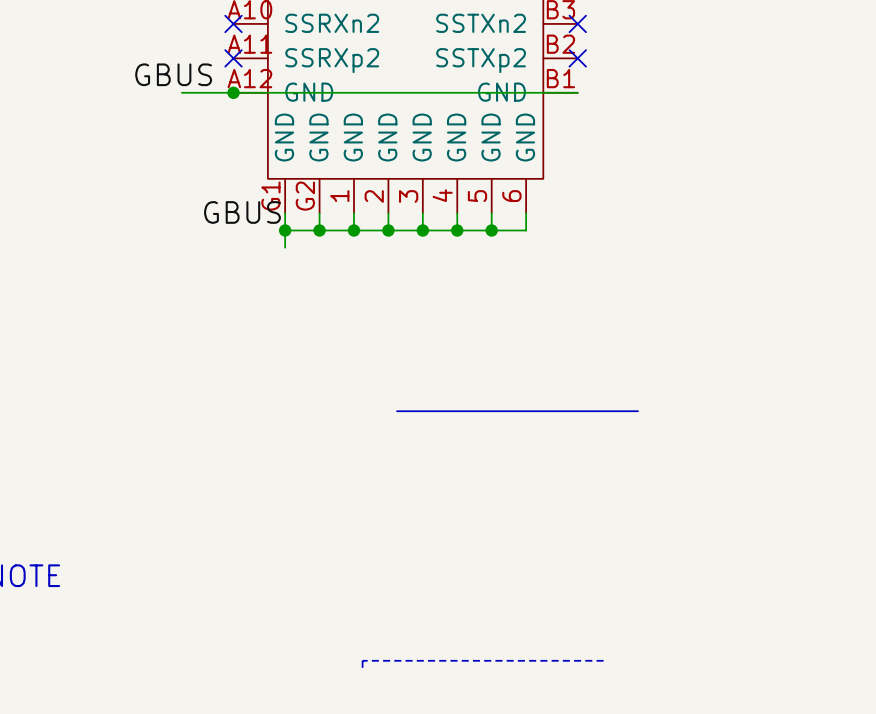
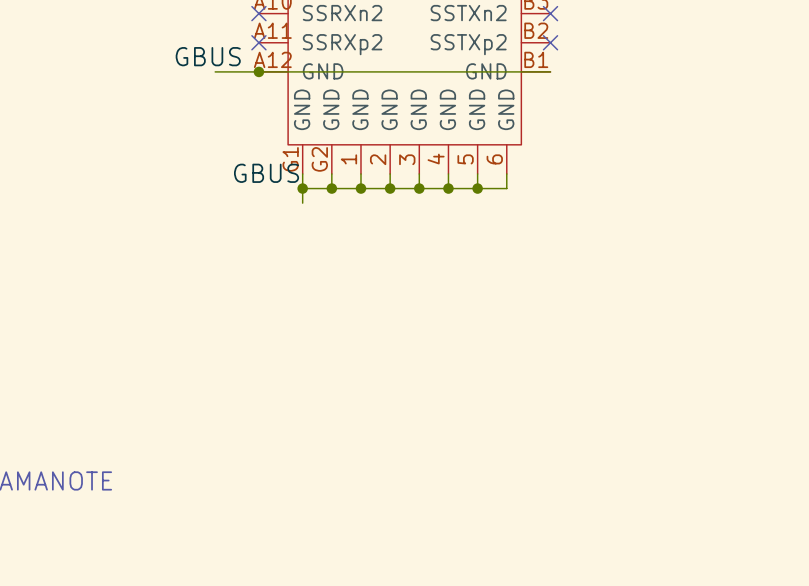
bus: (397, 411) (637, 411) -> none
line: (603, 660) (362, 660) (362, 669) -> none

